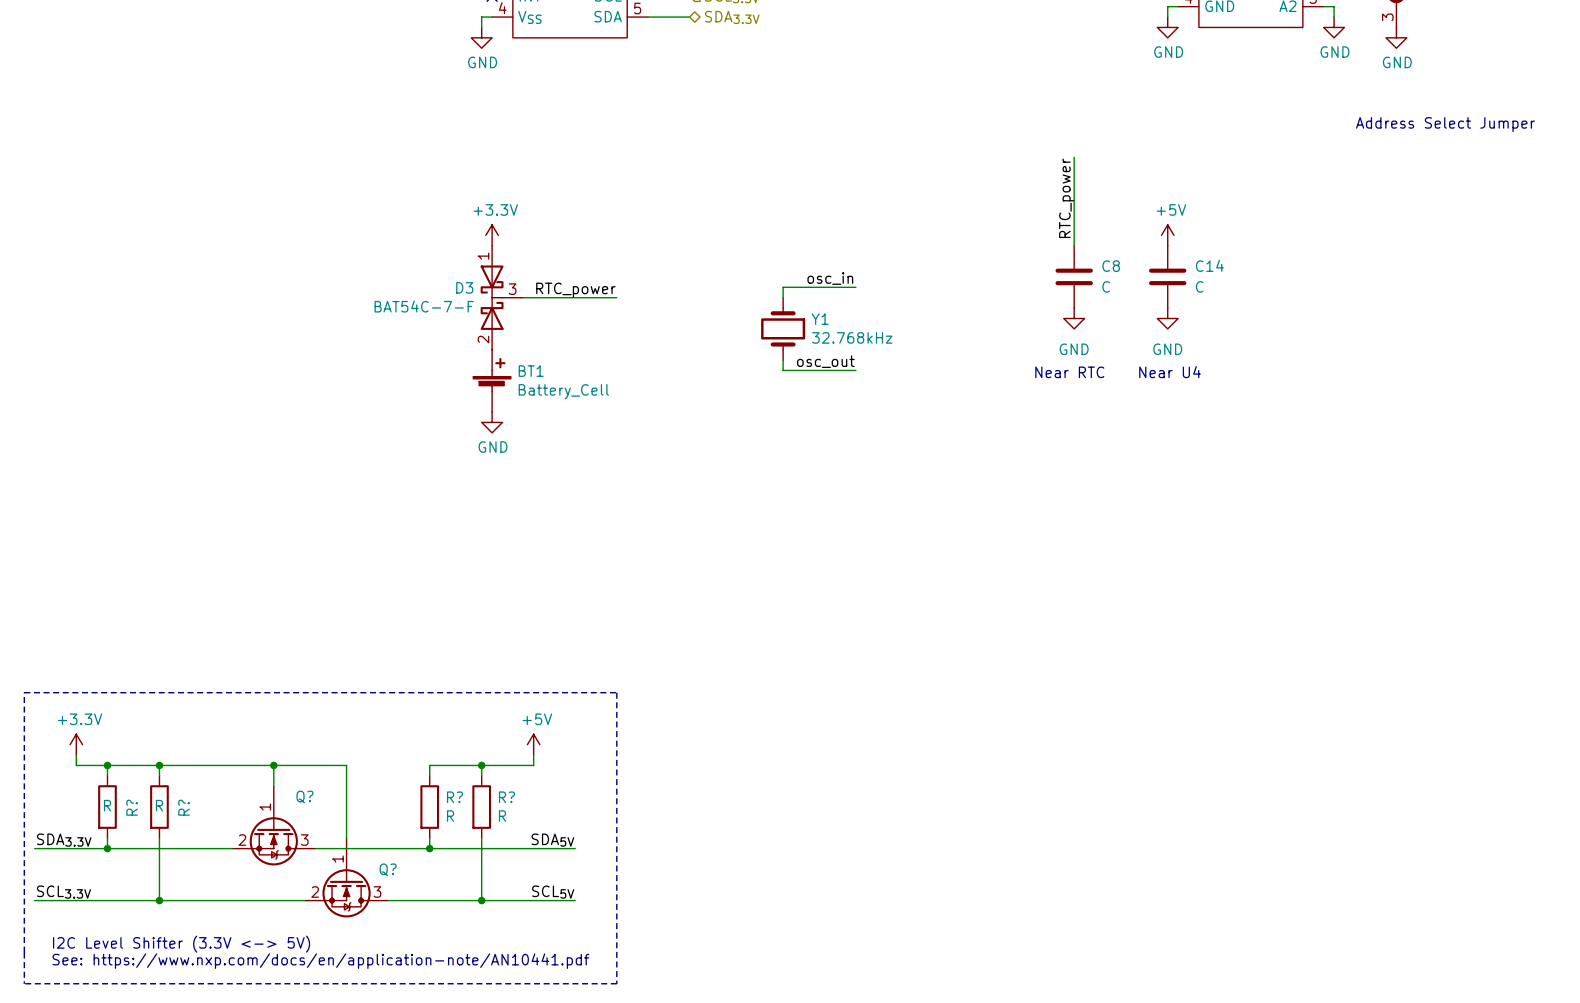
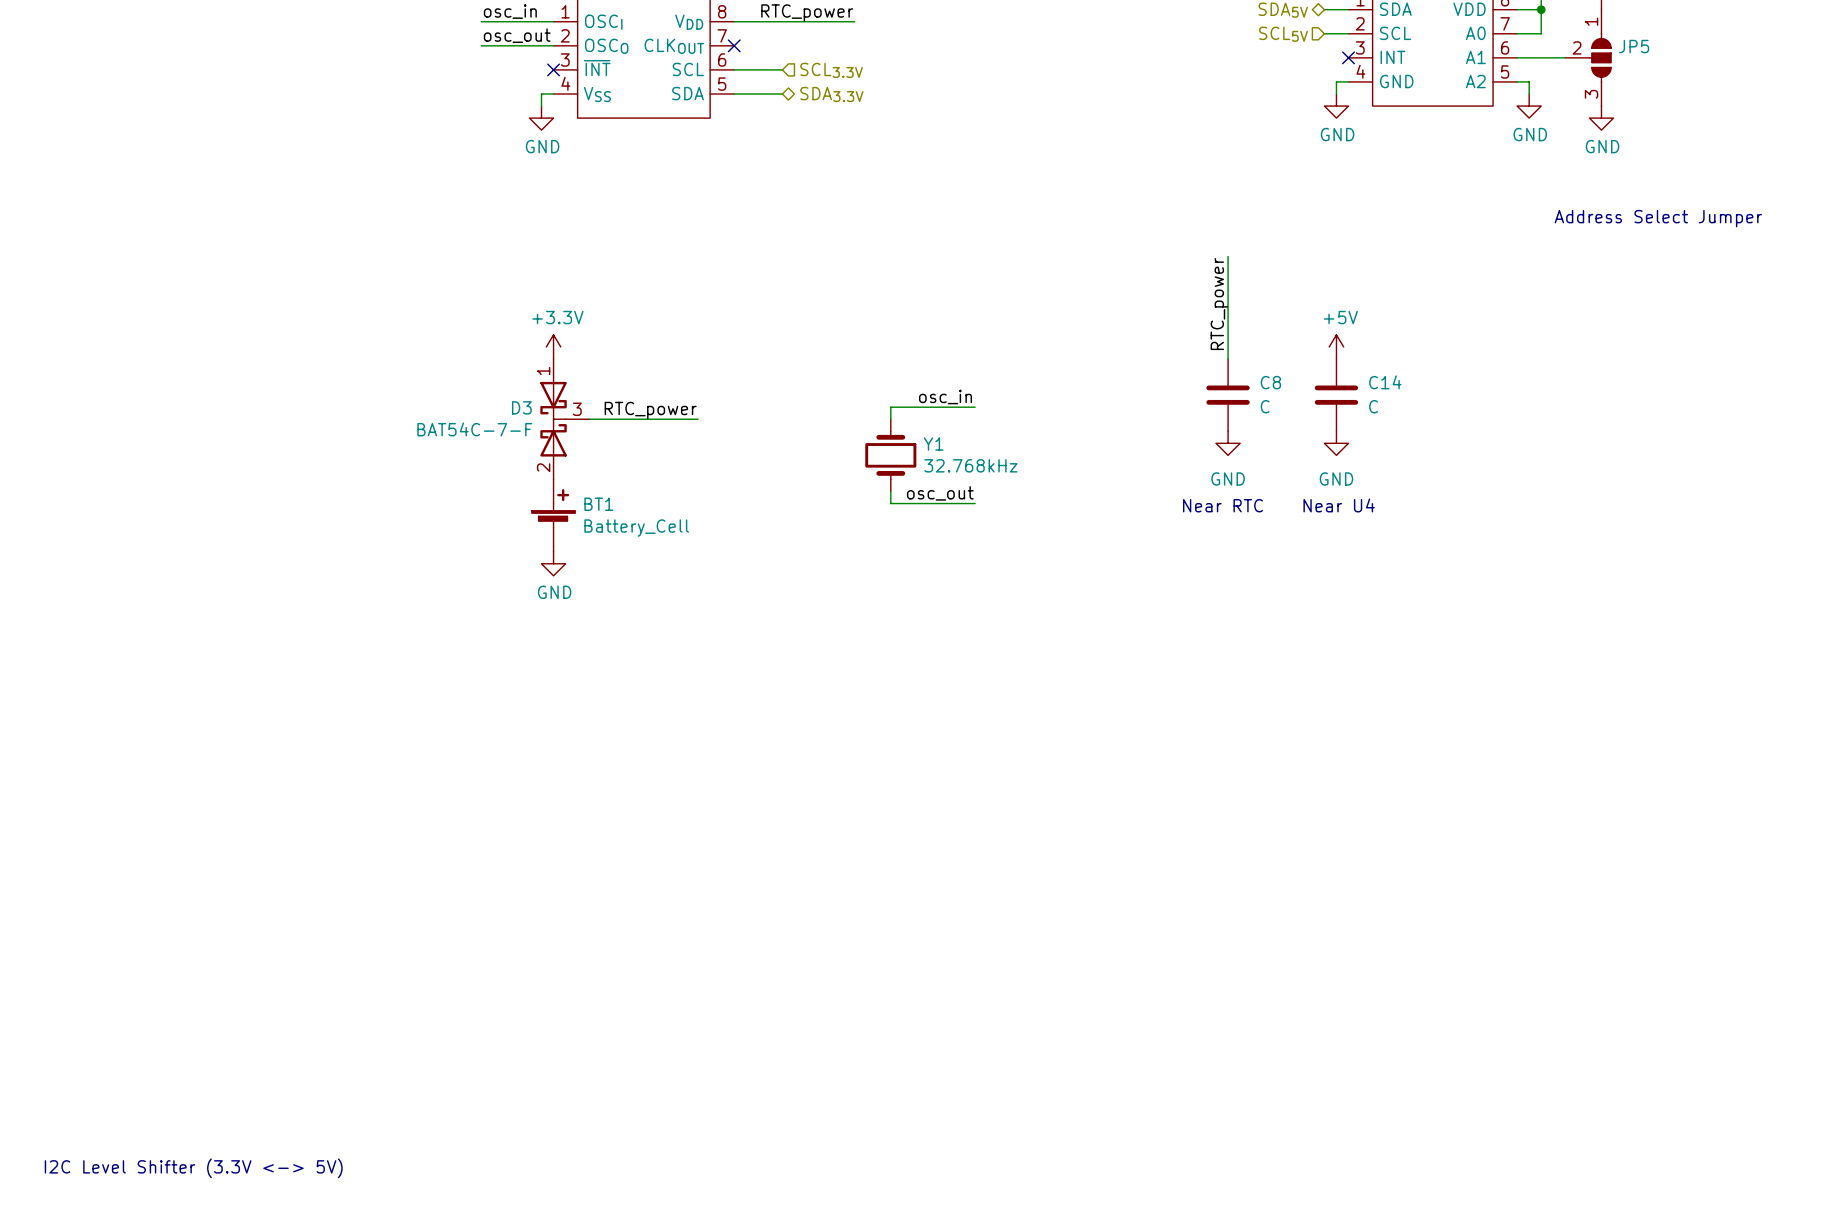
line: (24, 692) (616, 692) (616, 983) (24, 983) (24, 692) -> none
power symbol: +3.3V (76, 744) -> none
power symbol: +5V (533, 744) -> none
wire: (76, 755) (76, 765) (346, 765) (346, 838) -> none
wire: (533, 755) (533, 765) (429, 765) (429, 775) -> none
wire: (107, 765) (107, 775) -> none
junction: (107, 765) -> none
wire: (159, 765) (159, 775) -> none
junction: (159, 765) -> none
wire: (273, 765) (273, 786) -> none
junction: (273, 765) -> none
wire: (481, 765) (481, 775) -> none
junction: (481, 765) -> none
R?: R (107, 807) -> none
R?: R (159, 807) -> none
R?: R (429, 807) -> none
R?: R (481, 807) -> none
Q?: (273, 825) -> none
wire: (107, 838) (107, 848) -> none
wire: (159, 838) (159, 900) -> none
wire: (429, 838) (429, 848) -> none
wire: (481, 838) (481, 900) -> none
label: SDA3.3V (64, 840) -> none
label: SDA5V (552, 840) -> none
wire: (34, 848) (232, 848) -> none
junction: (107, 848) -> none
wire: (315, 848) (575, 848) -> none
junction: (429, 848) -> none
Q?: (346, 877) -> none
label: SCL3.3V (63, 892) -> none
label: SCL5V (553, 892) -> none
wire: (34, 900) (304, 900) -> none
junction: (159, 900) -> none
wire: (388, 900) (575, 900) -> none
junction: (481, 900) -> none
text: See: https://www.nxp.com/docs/en/application-note/AN10441.pdf (320, 961) -> none

